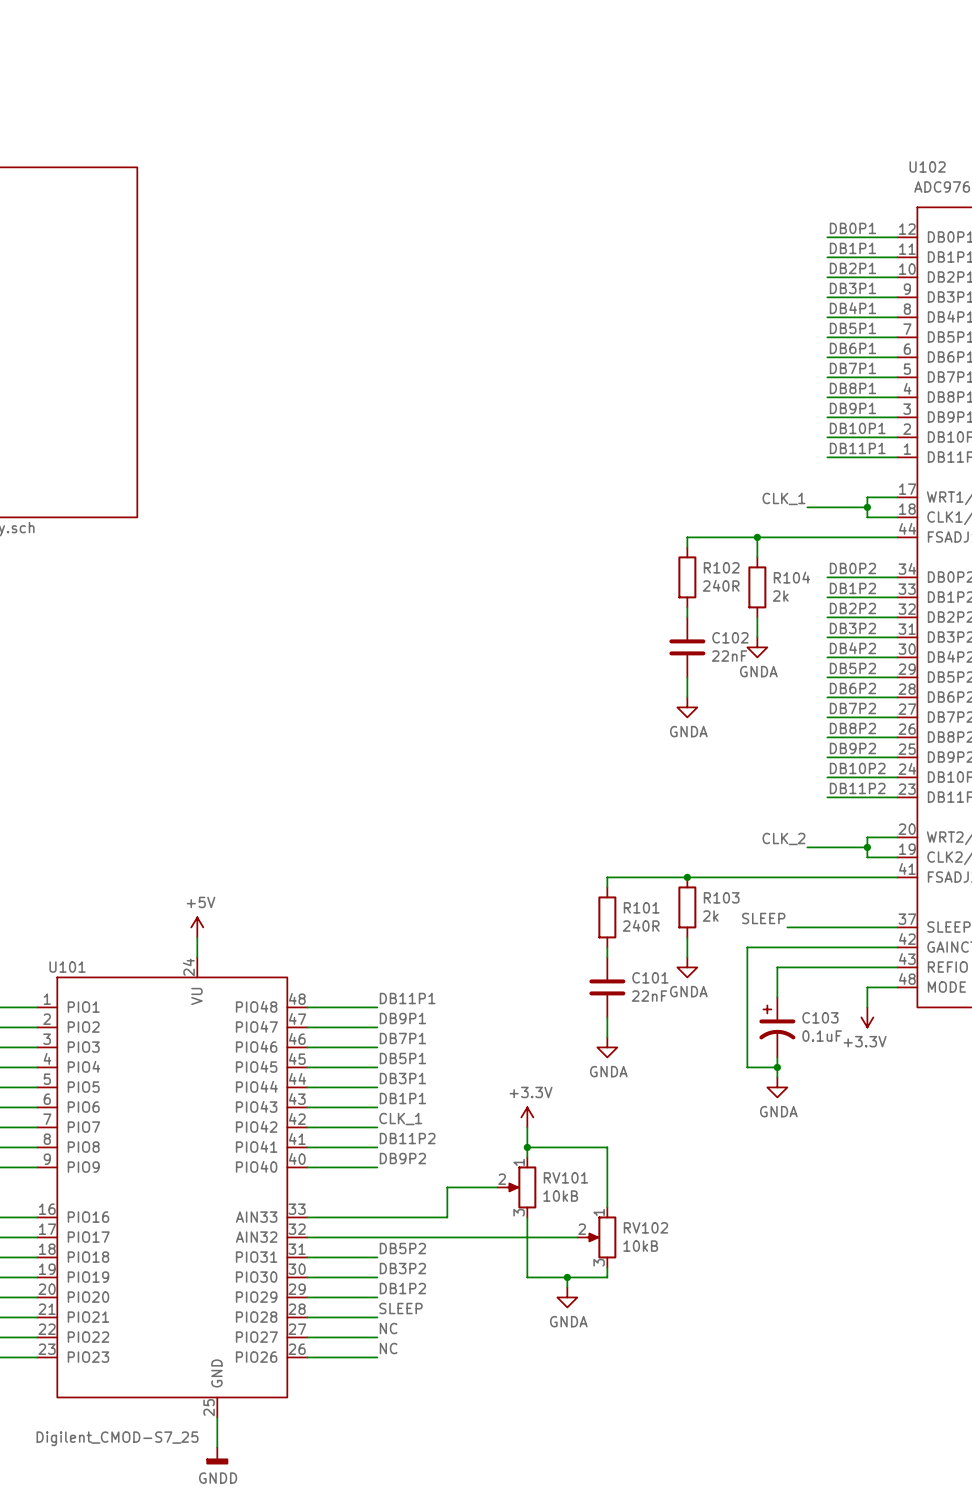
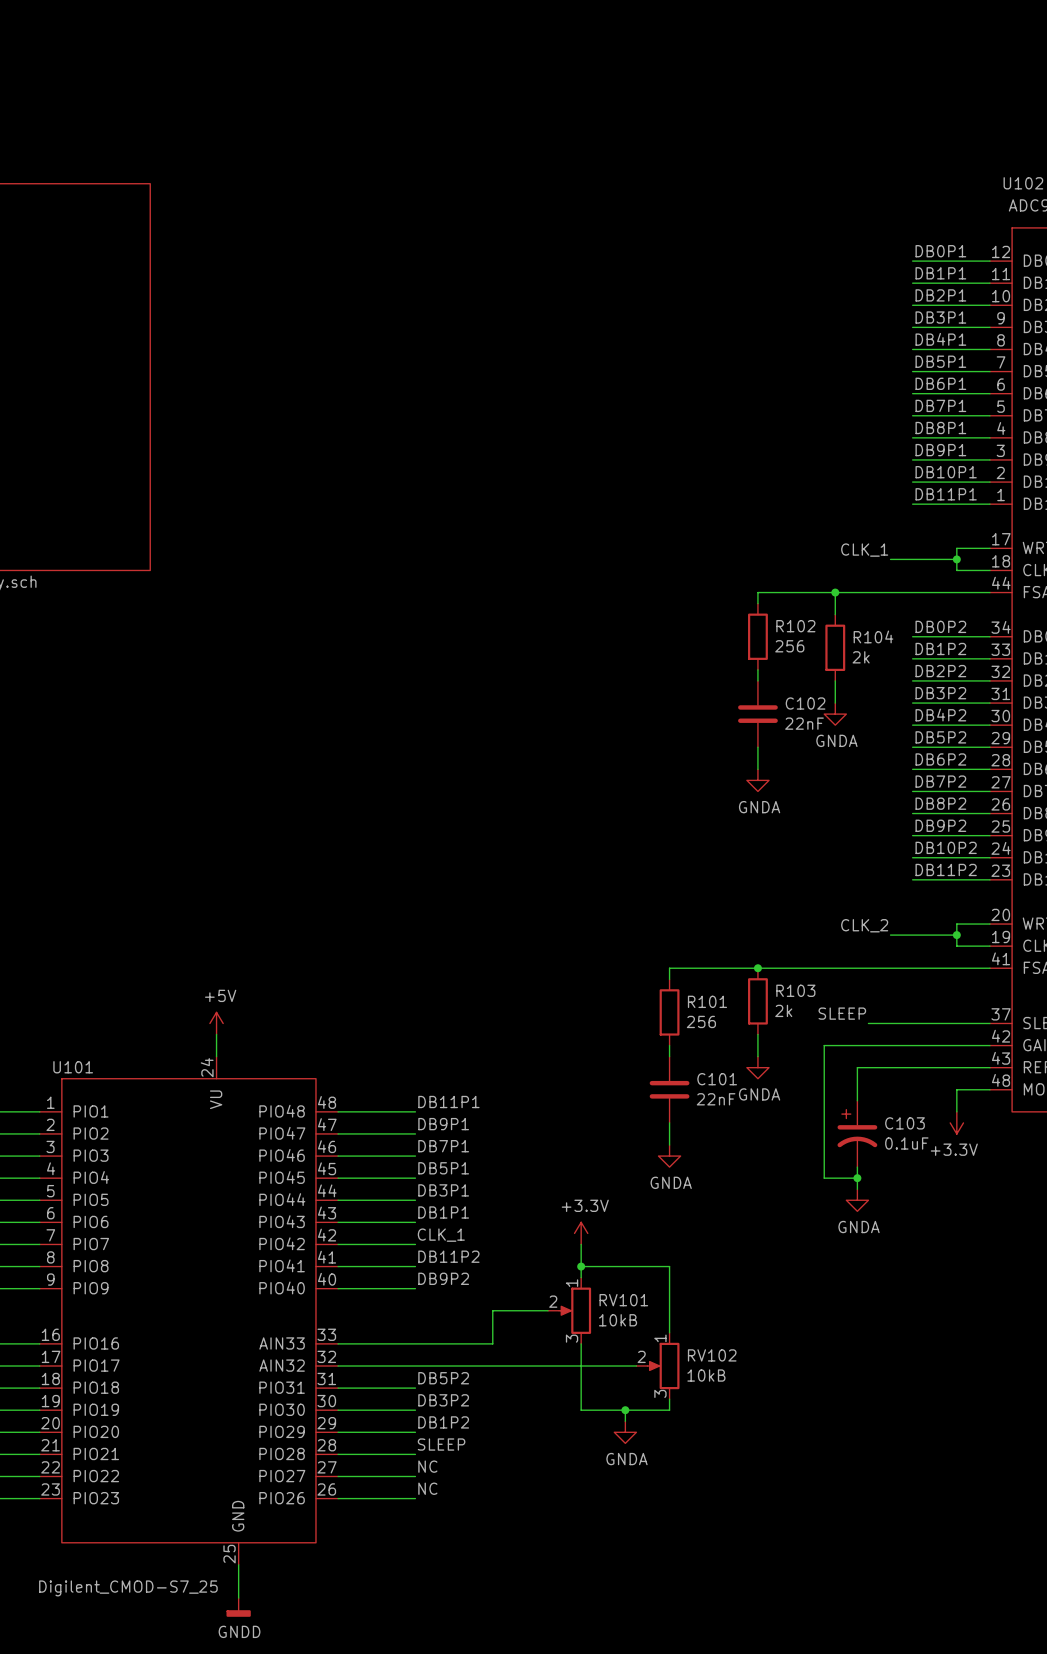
R102 value: 240R (721, 585) -> 256 (789, 646)
R101 value: 240R (641, 925) -> 256 (701, 1021)

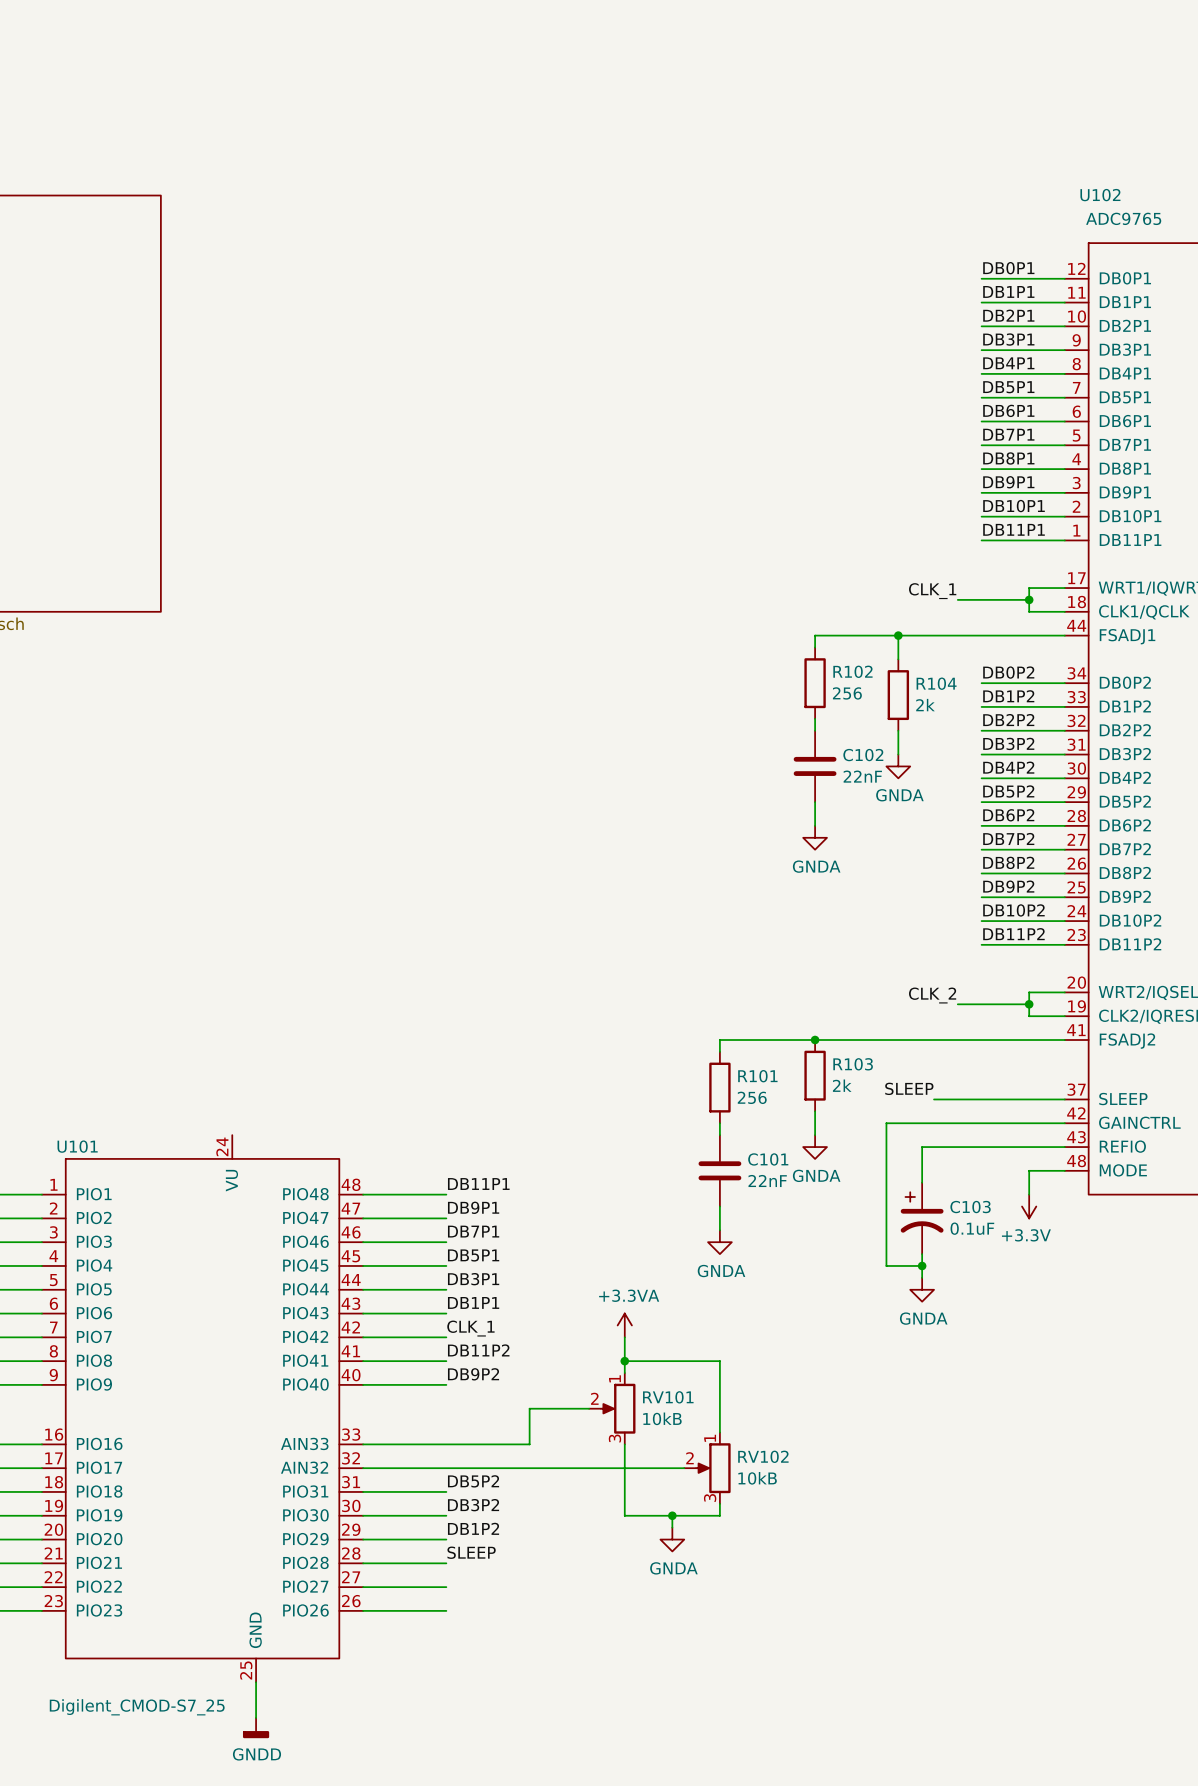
power symbol: +5V (216, 1023) -> none
wire: (216, 1034) (216, 1056) -> none
power symbol: +3.3V (581, 1233) -> +3.3VA (624, 1325)
label: NC (427, 1466) -> none
label: NC (427, 1488) -> none

